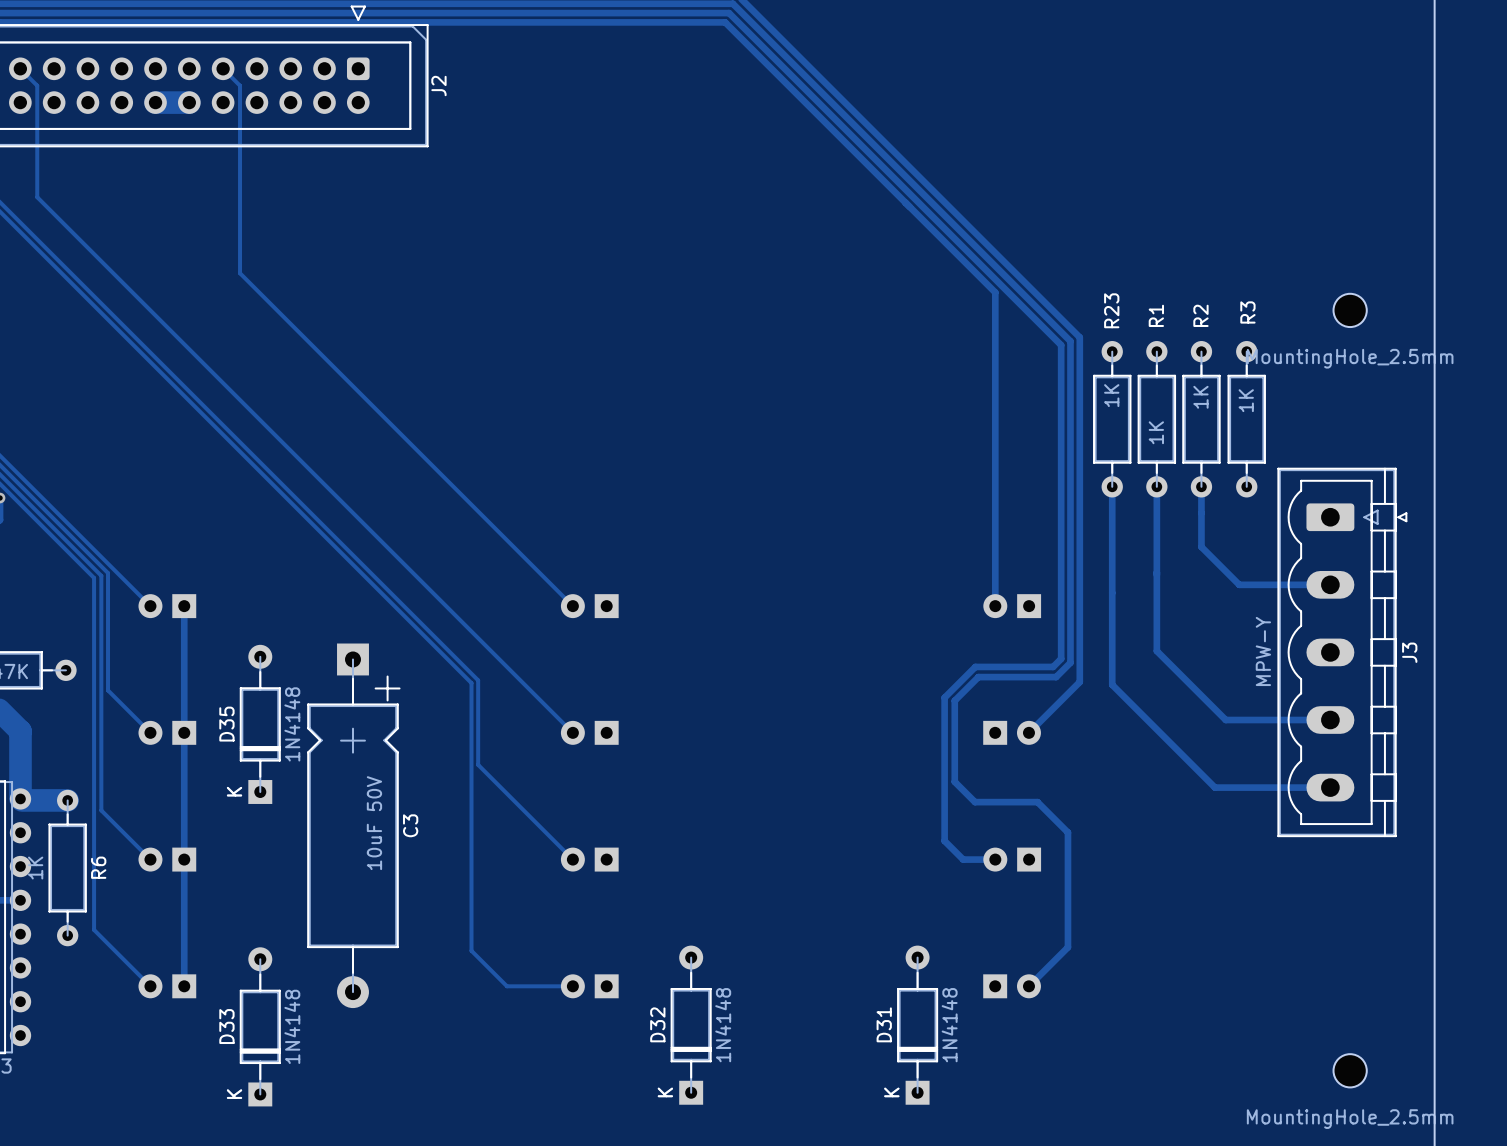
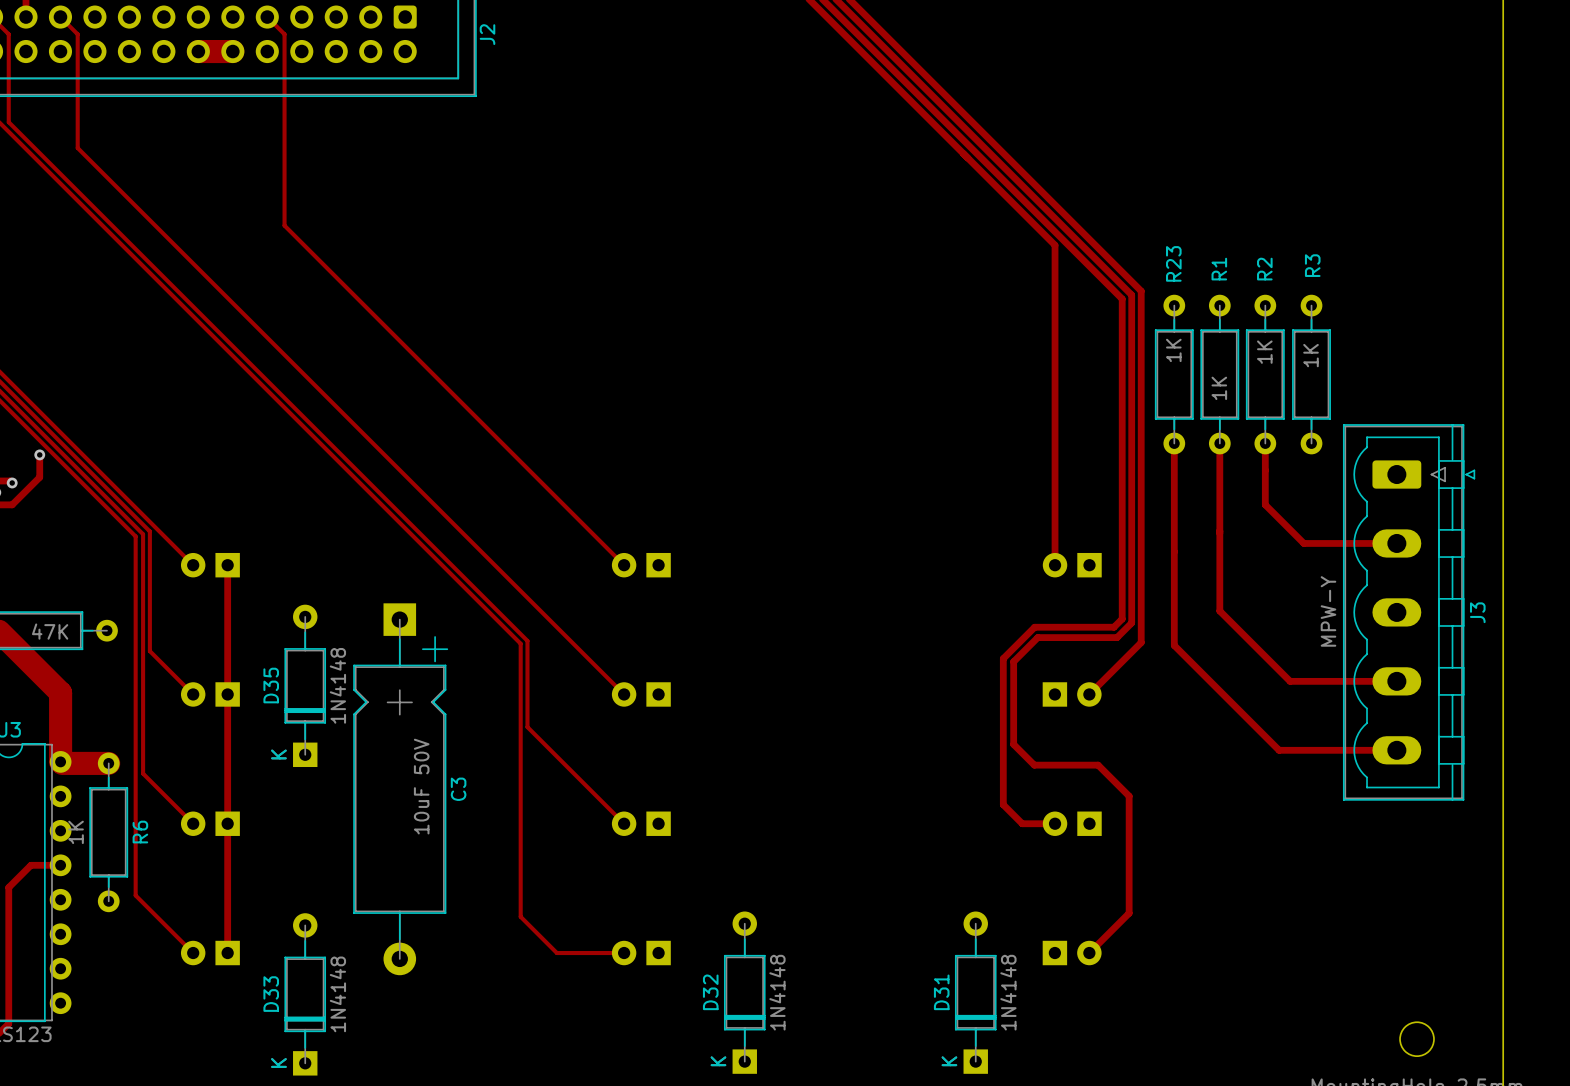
part: MountingHole_2.5mm (1350, 310) -> none

